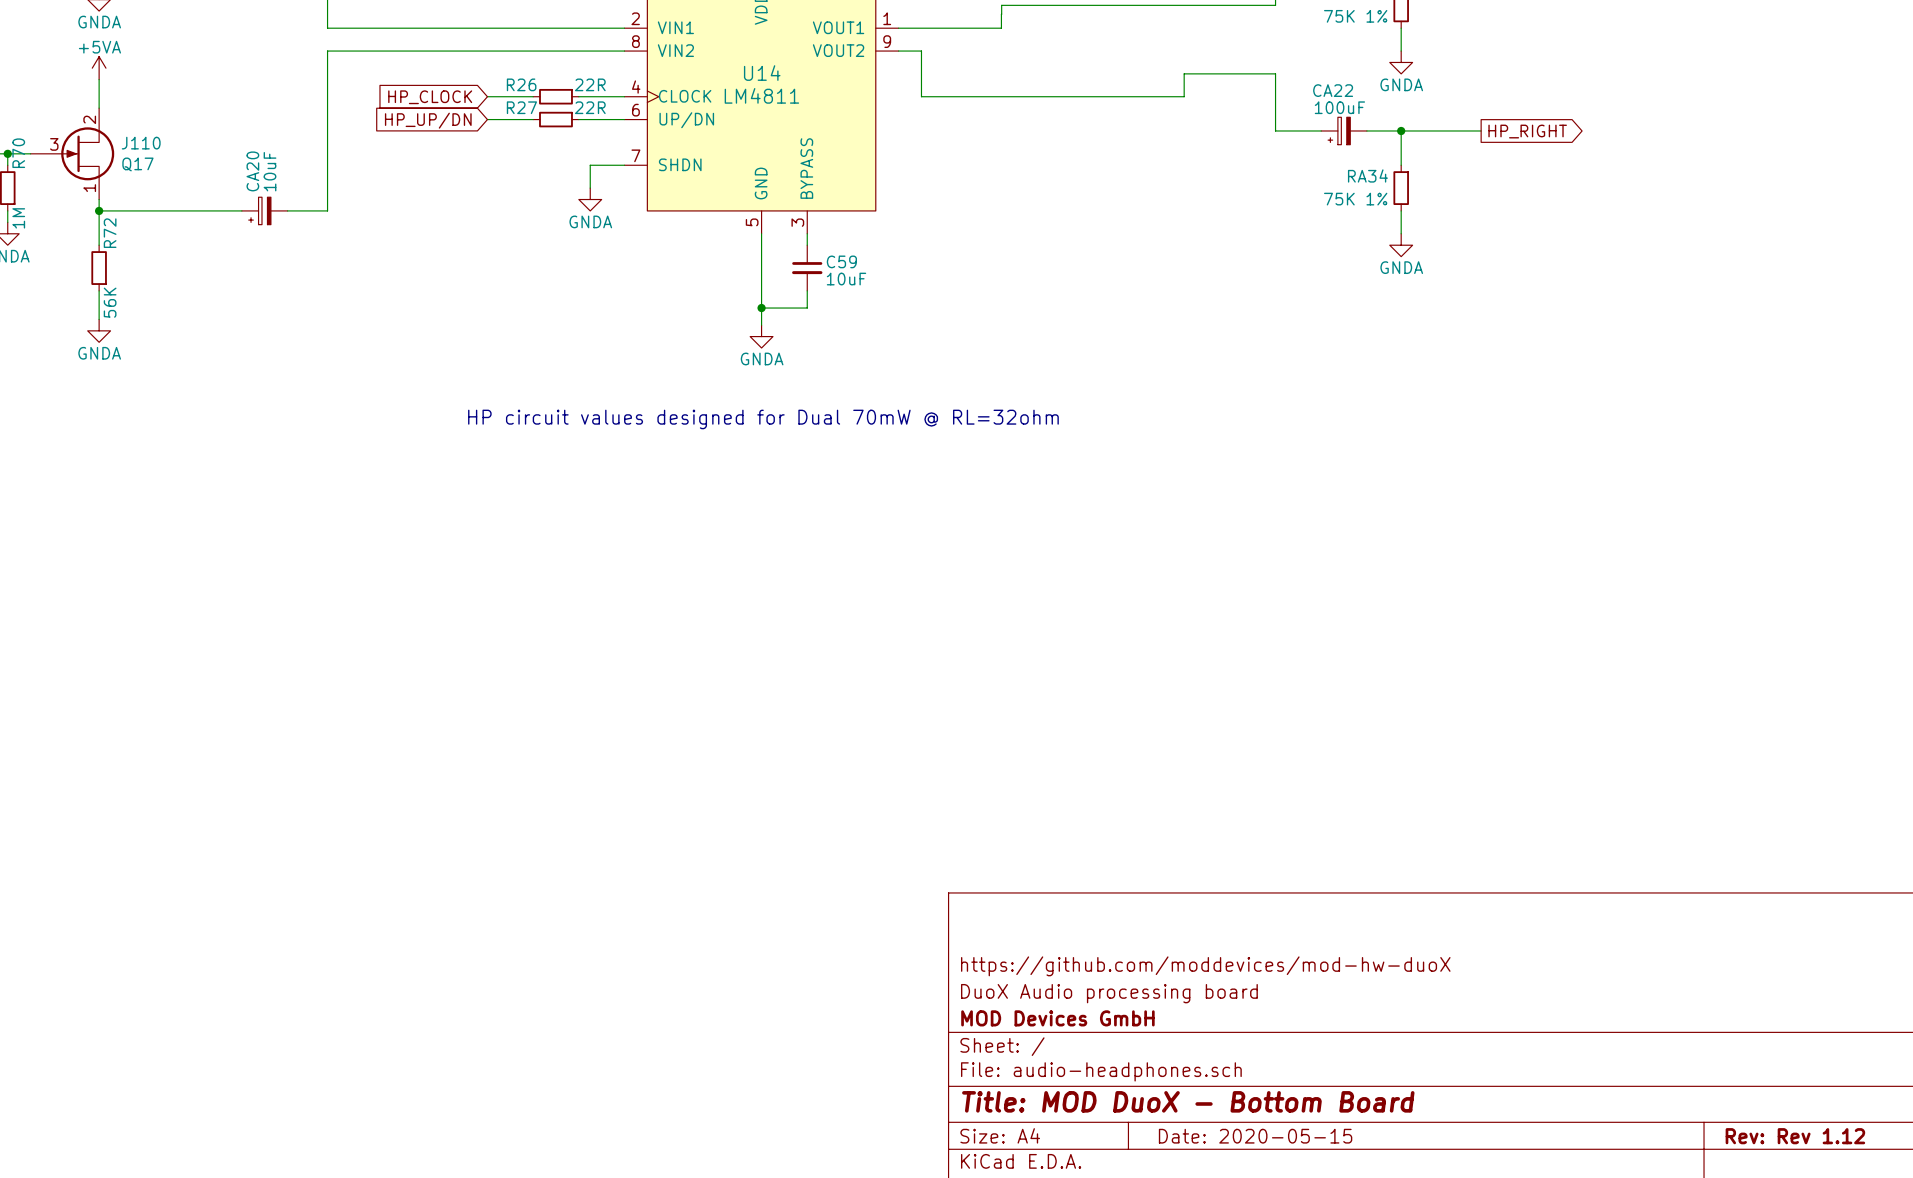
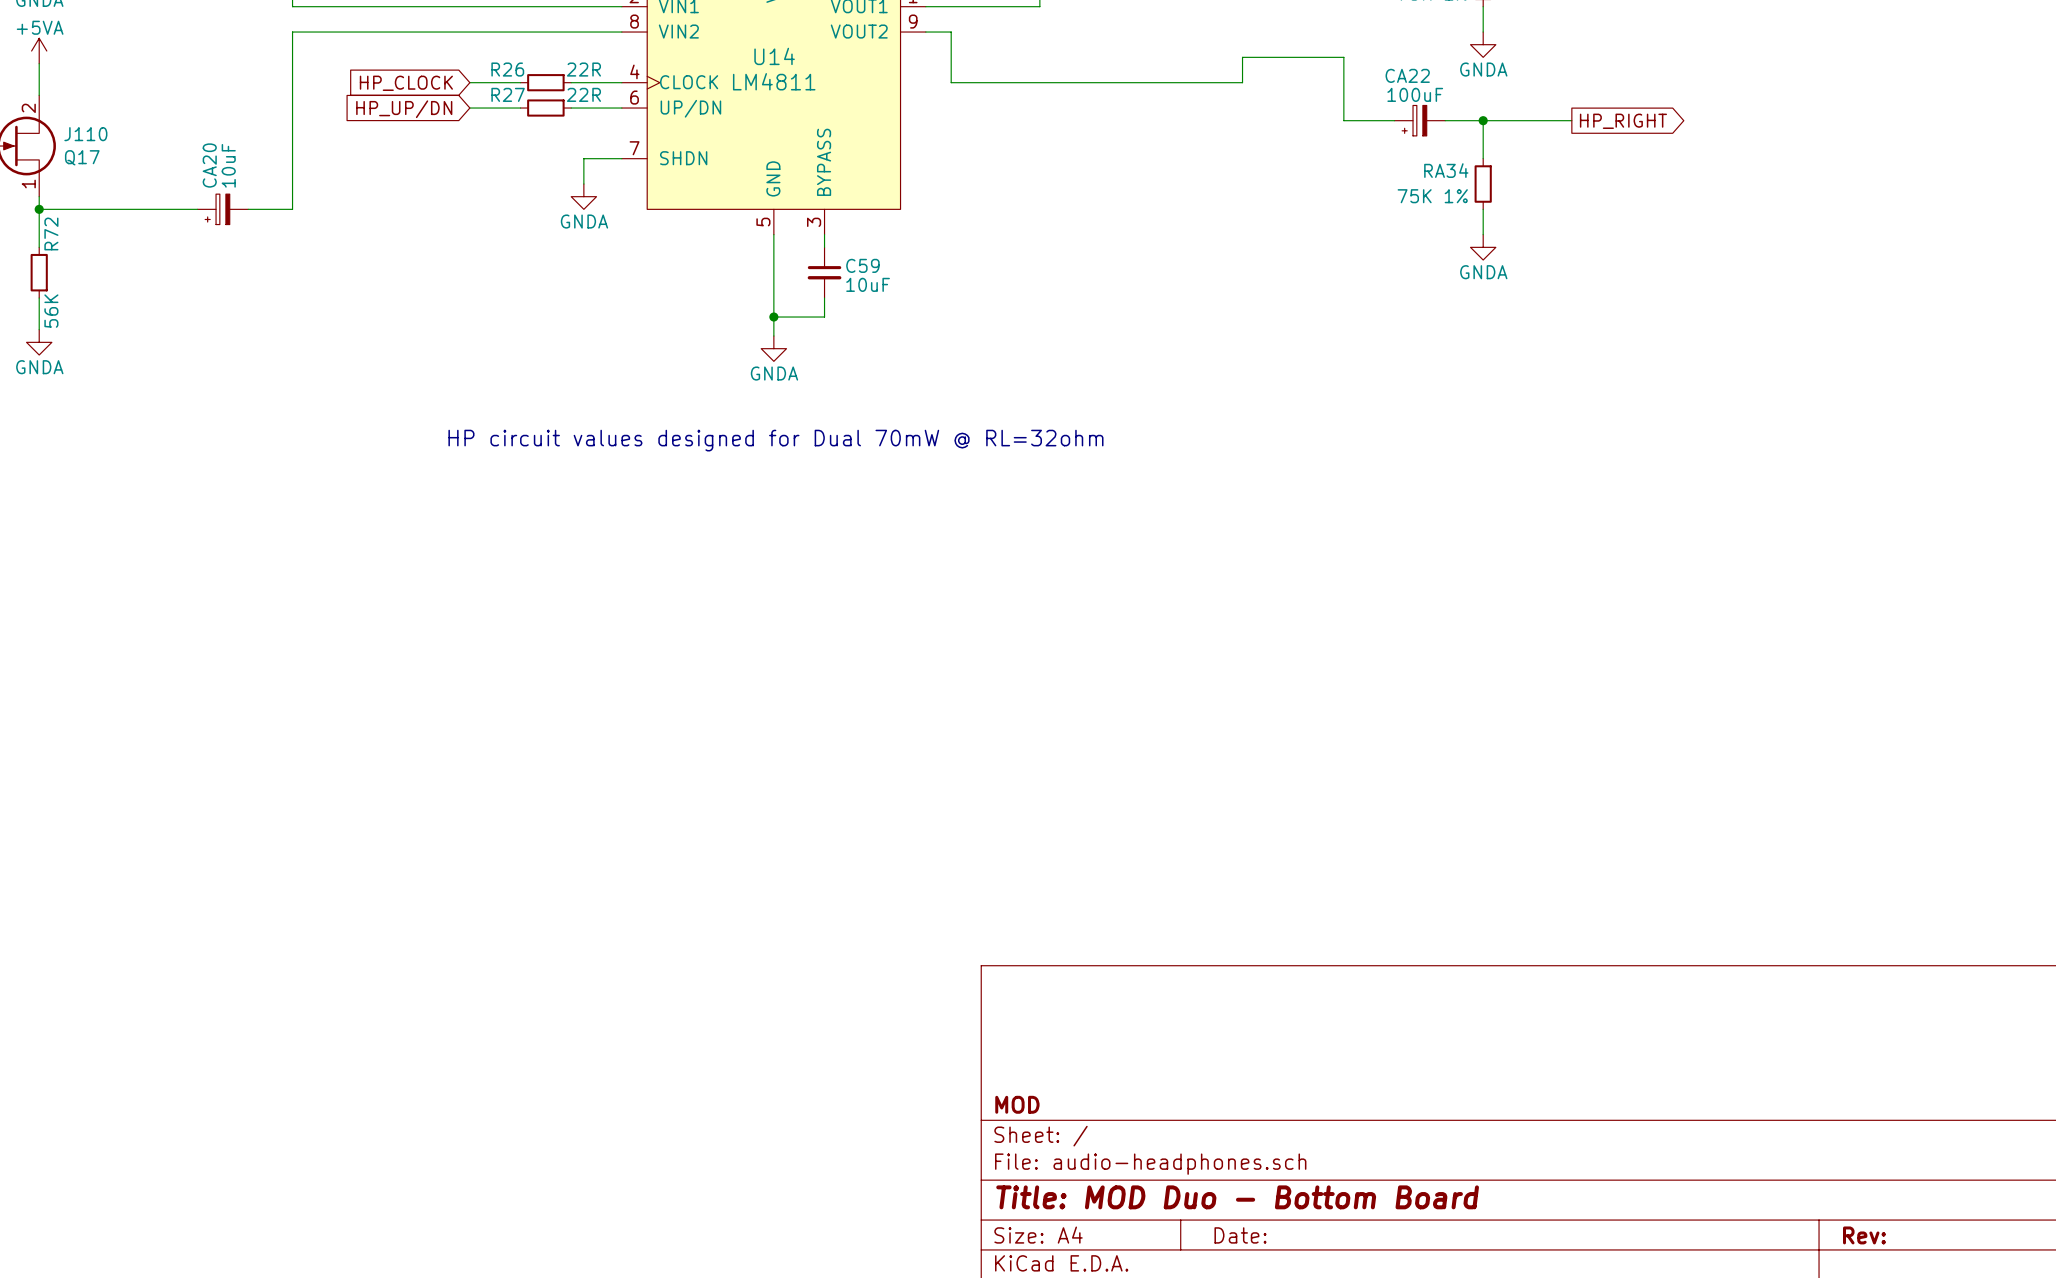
title block: https://github.com/moddevices/mod-hw-duoX (1205, 966) -> none
title block: DuoX Audio processing board (1109, 993) -> none
title block: MOD Devices GmbH (1057, 1018) -> MOD (1017, 1104)
title block: Title: MOD DuoX - Bottom Board (1188, 1101) -> Title: MOD Duo - Bottom Board (1237, 1197)
title block: Date: 2020-05-15 (1255, 1136) -> Date: (1240, 1235)
title block: Rev: Rev 1.12 (1795, 1136) -> Rev: (1864, 1235)

